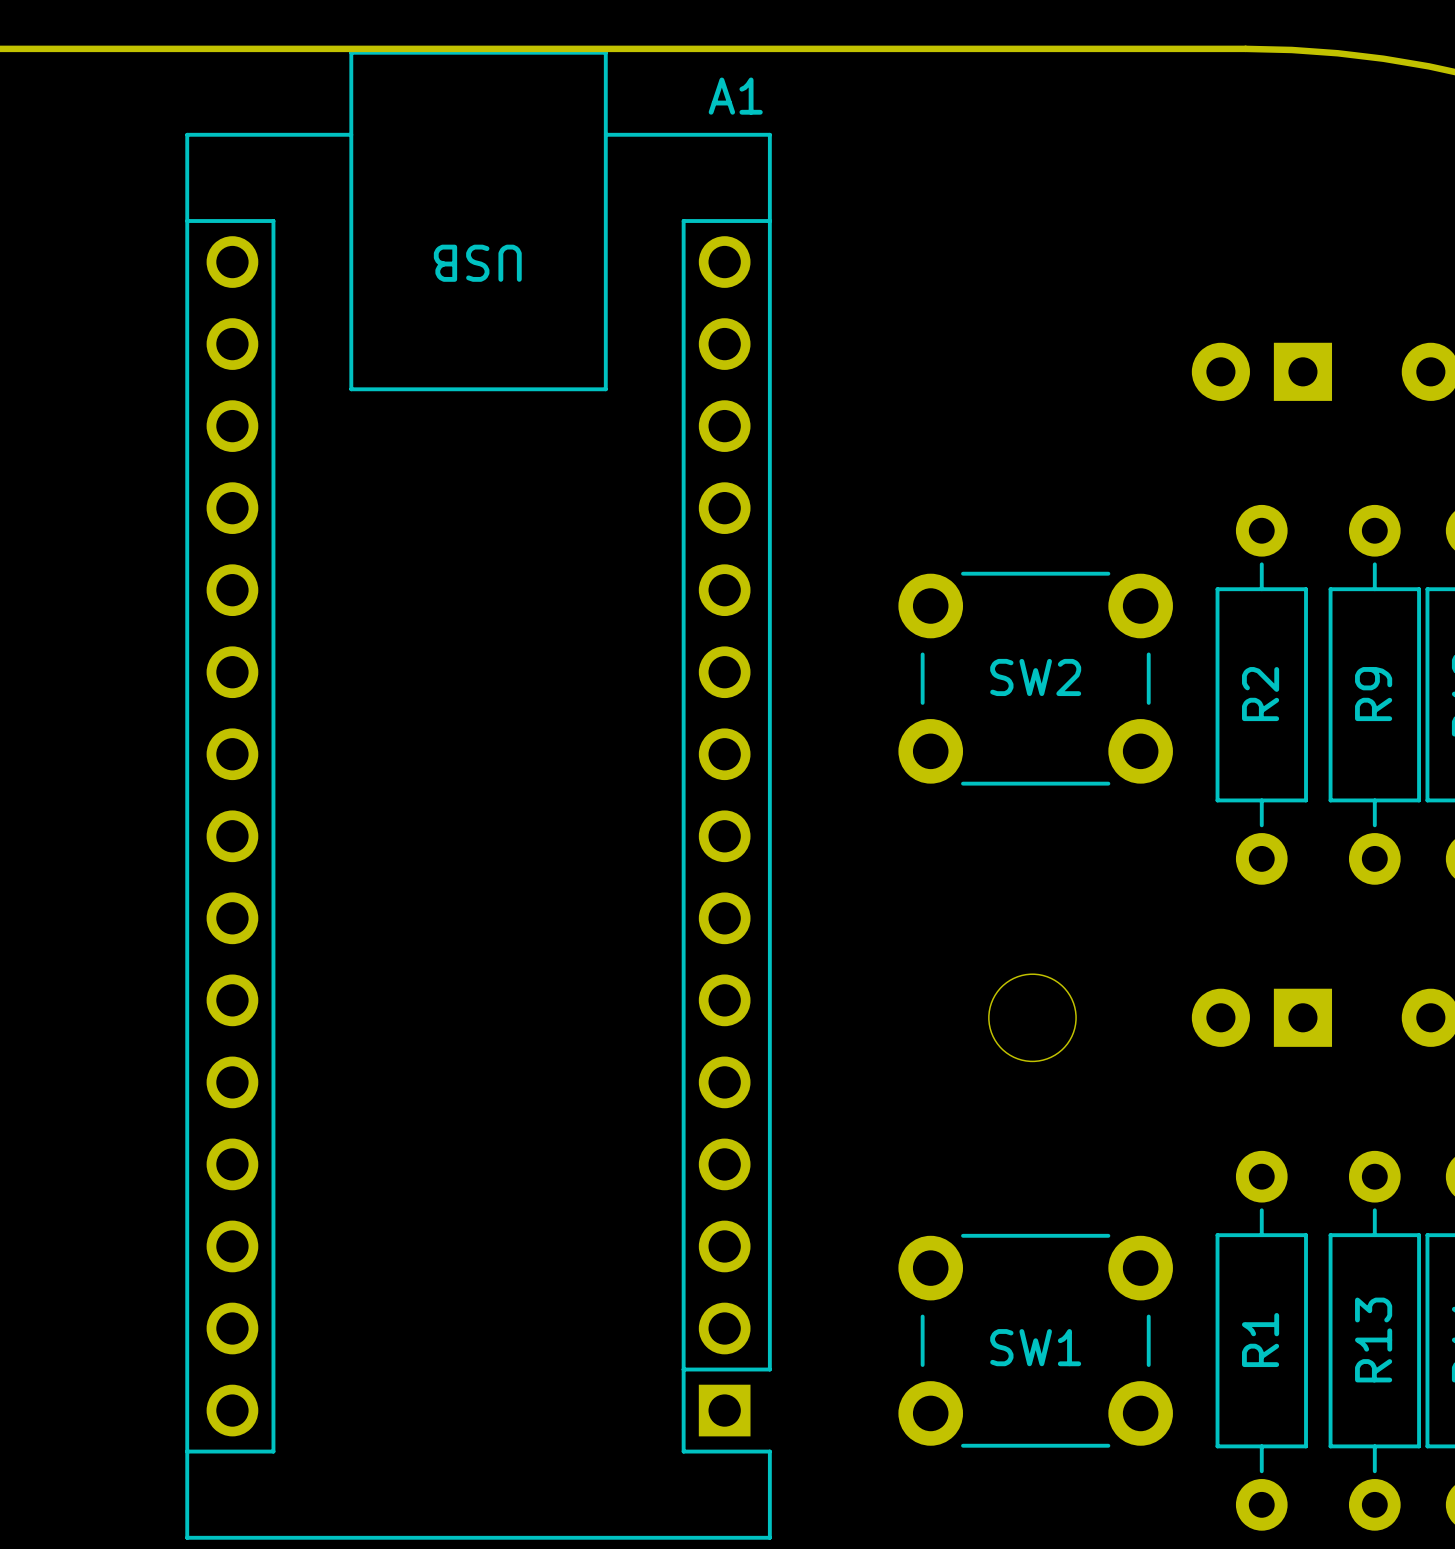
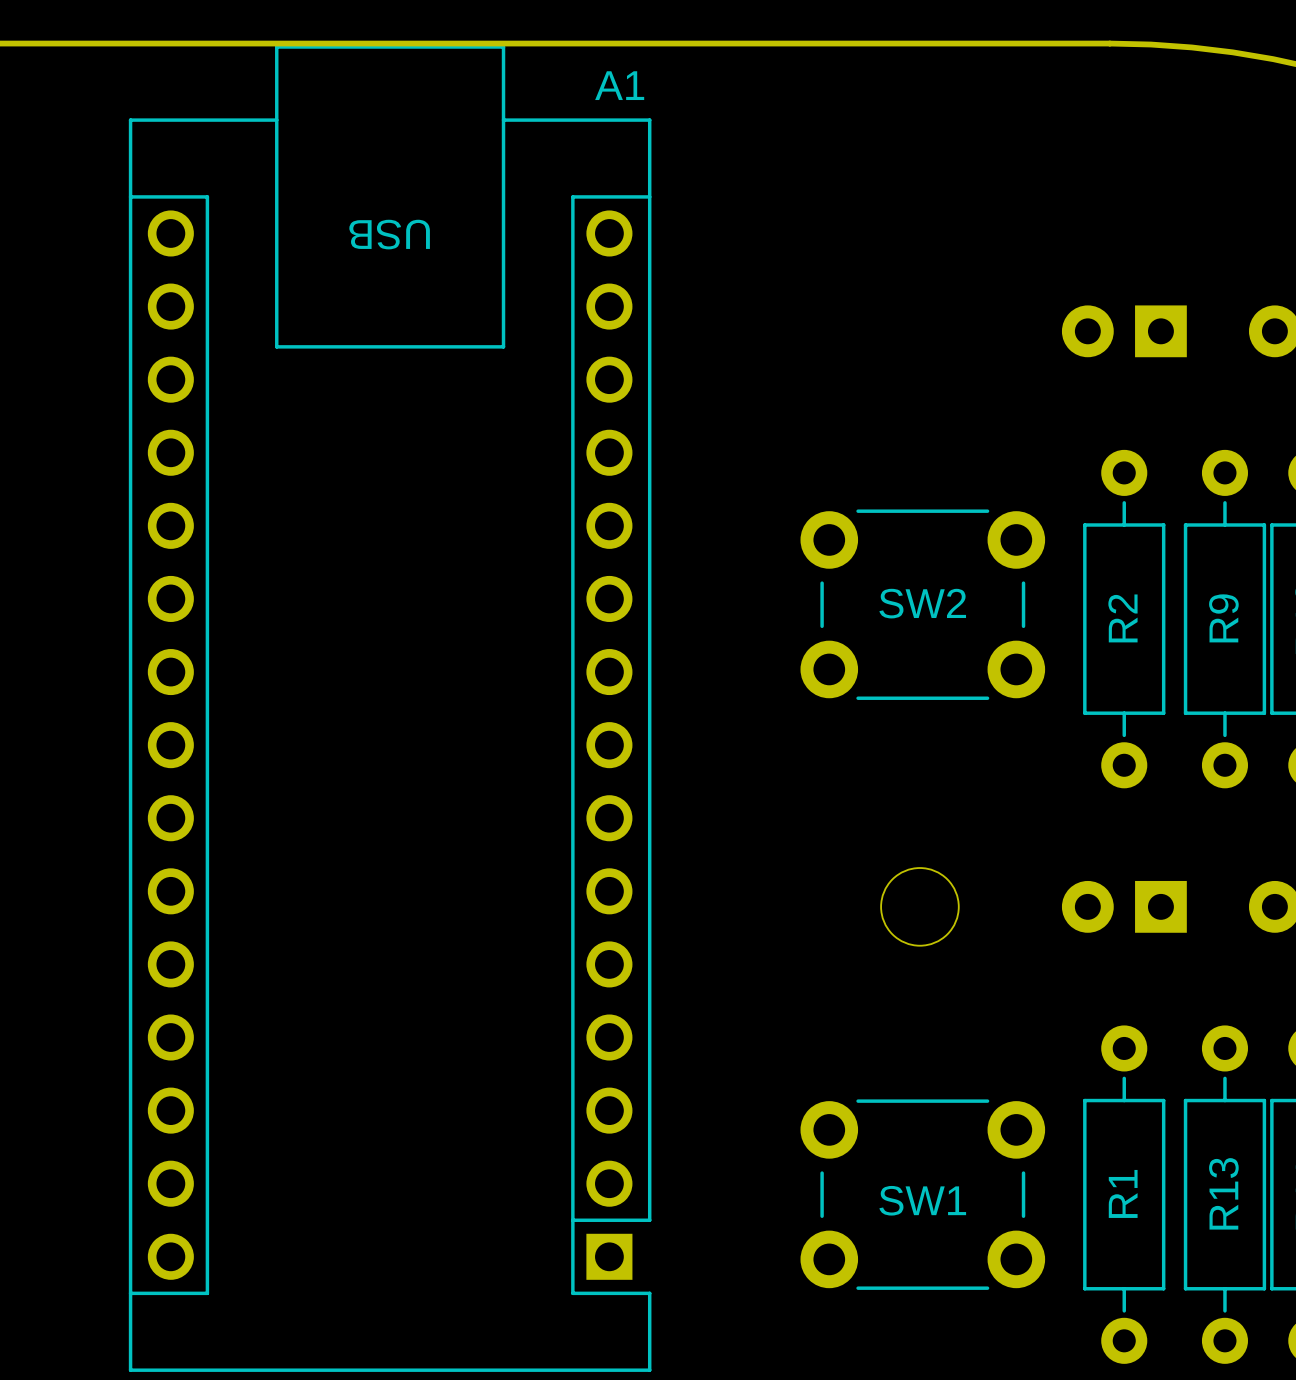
A1 position: (478, 795) -> (390, 708)

